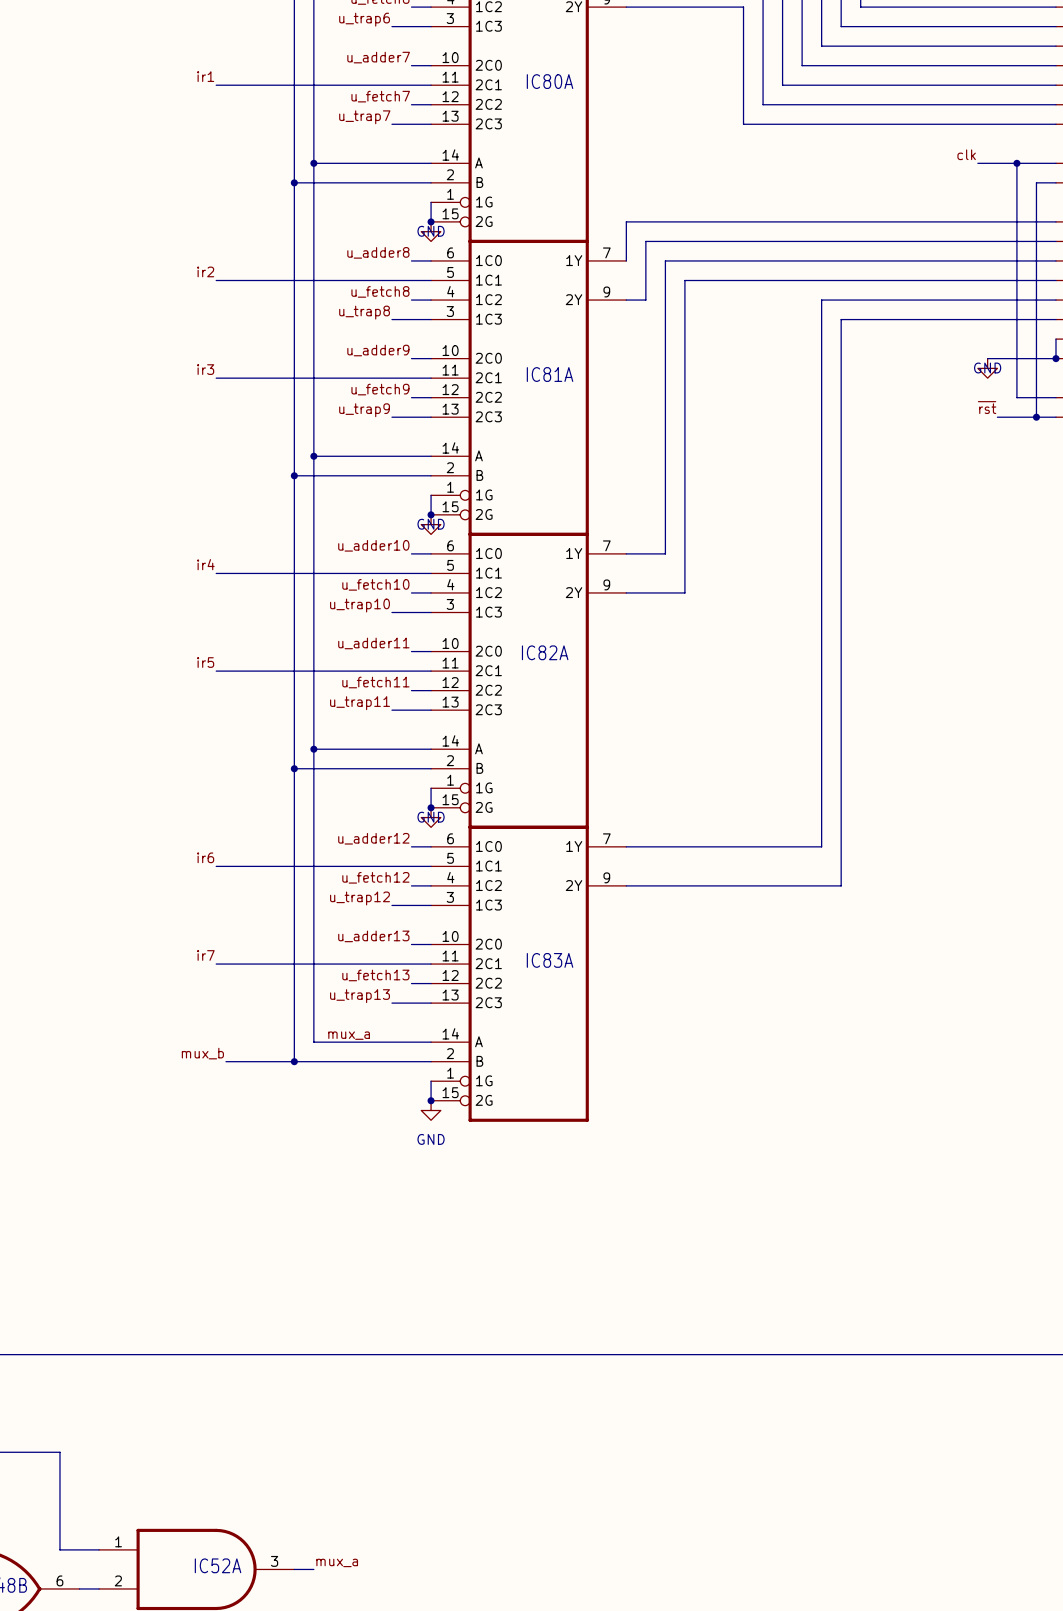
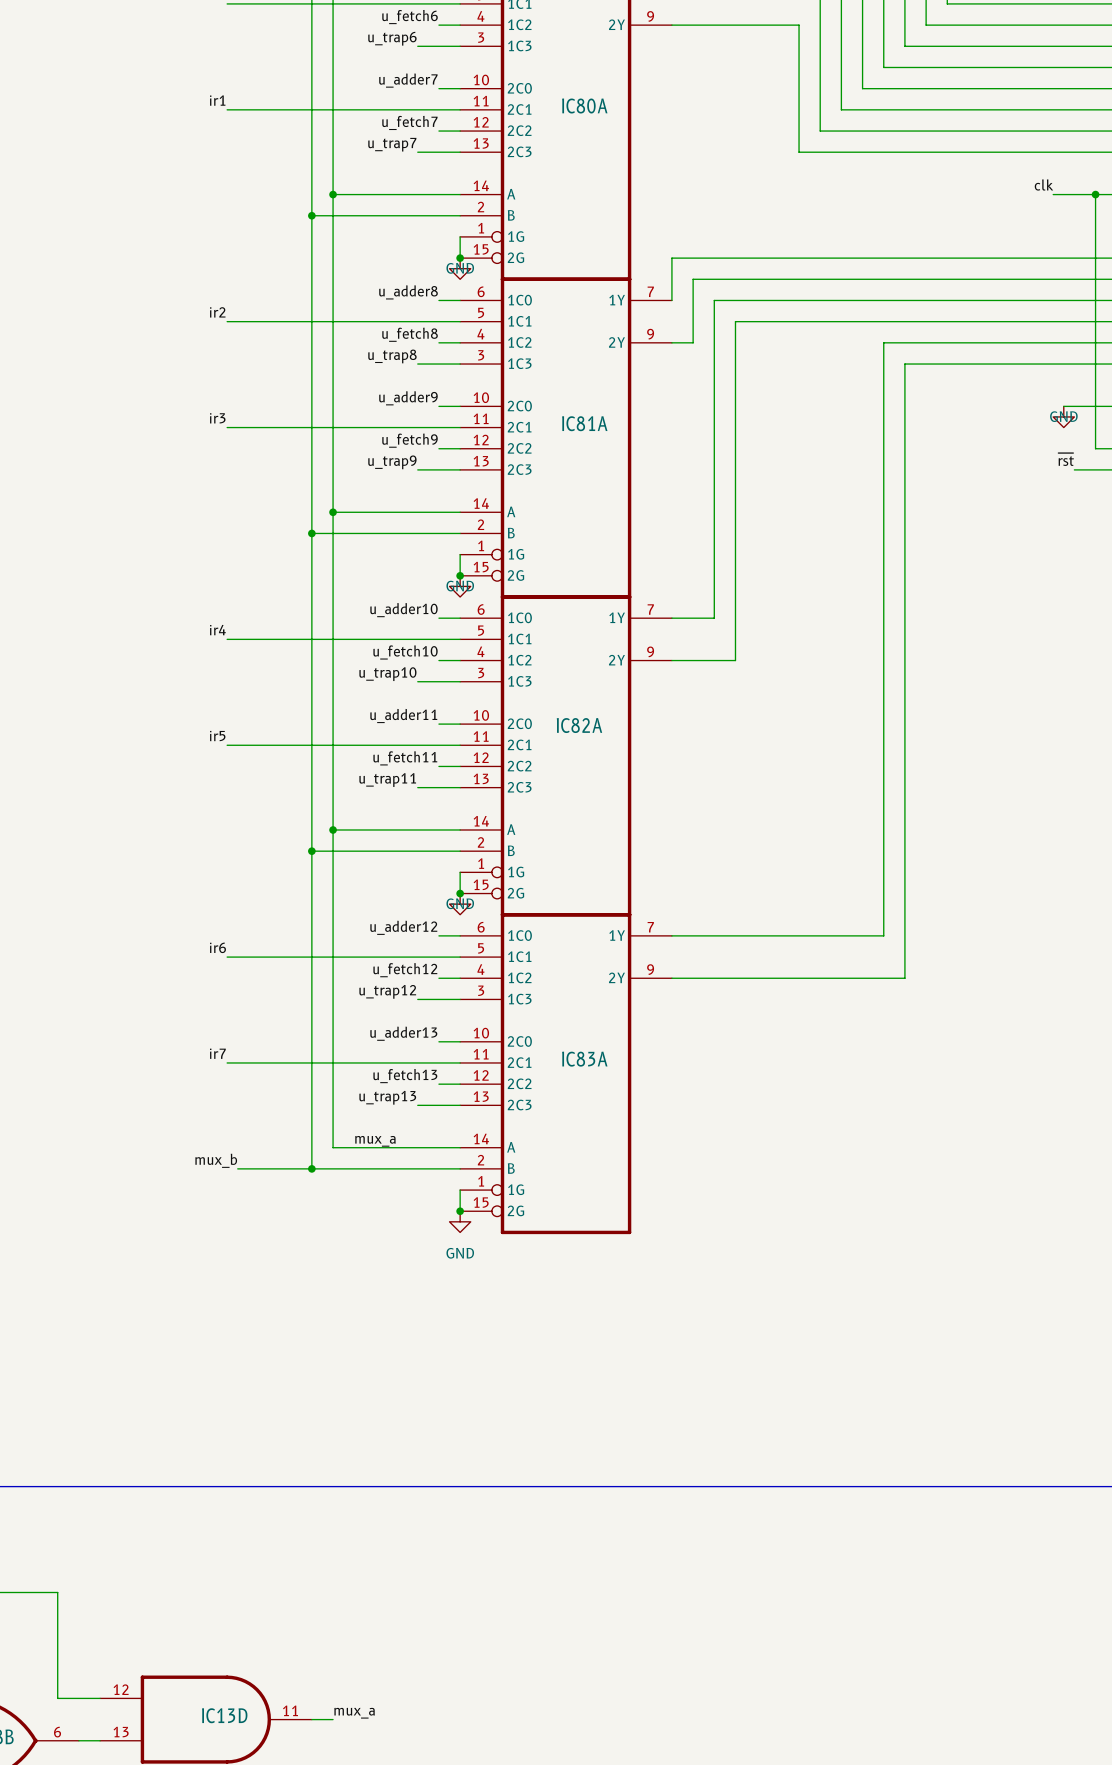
IC52A pin number: 1 (118, 1541) -> 12 (121, 1689)
IC52A pin number: 3 (274, 1561) -> 11 (290, 1710)
IC52A name: IC52A (218, 1565) -> IC13D (224, 1715)
IC52A pin number: 2 (118, 1580) -> 13 (121, 1732)

